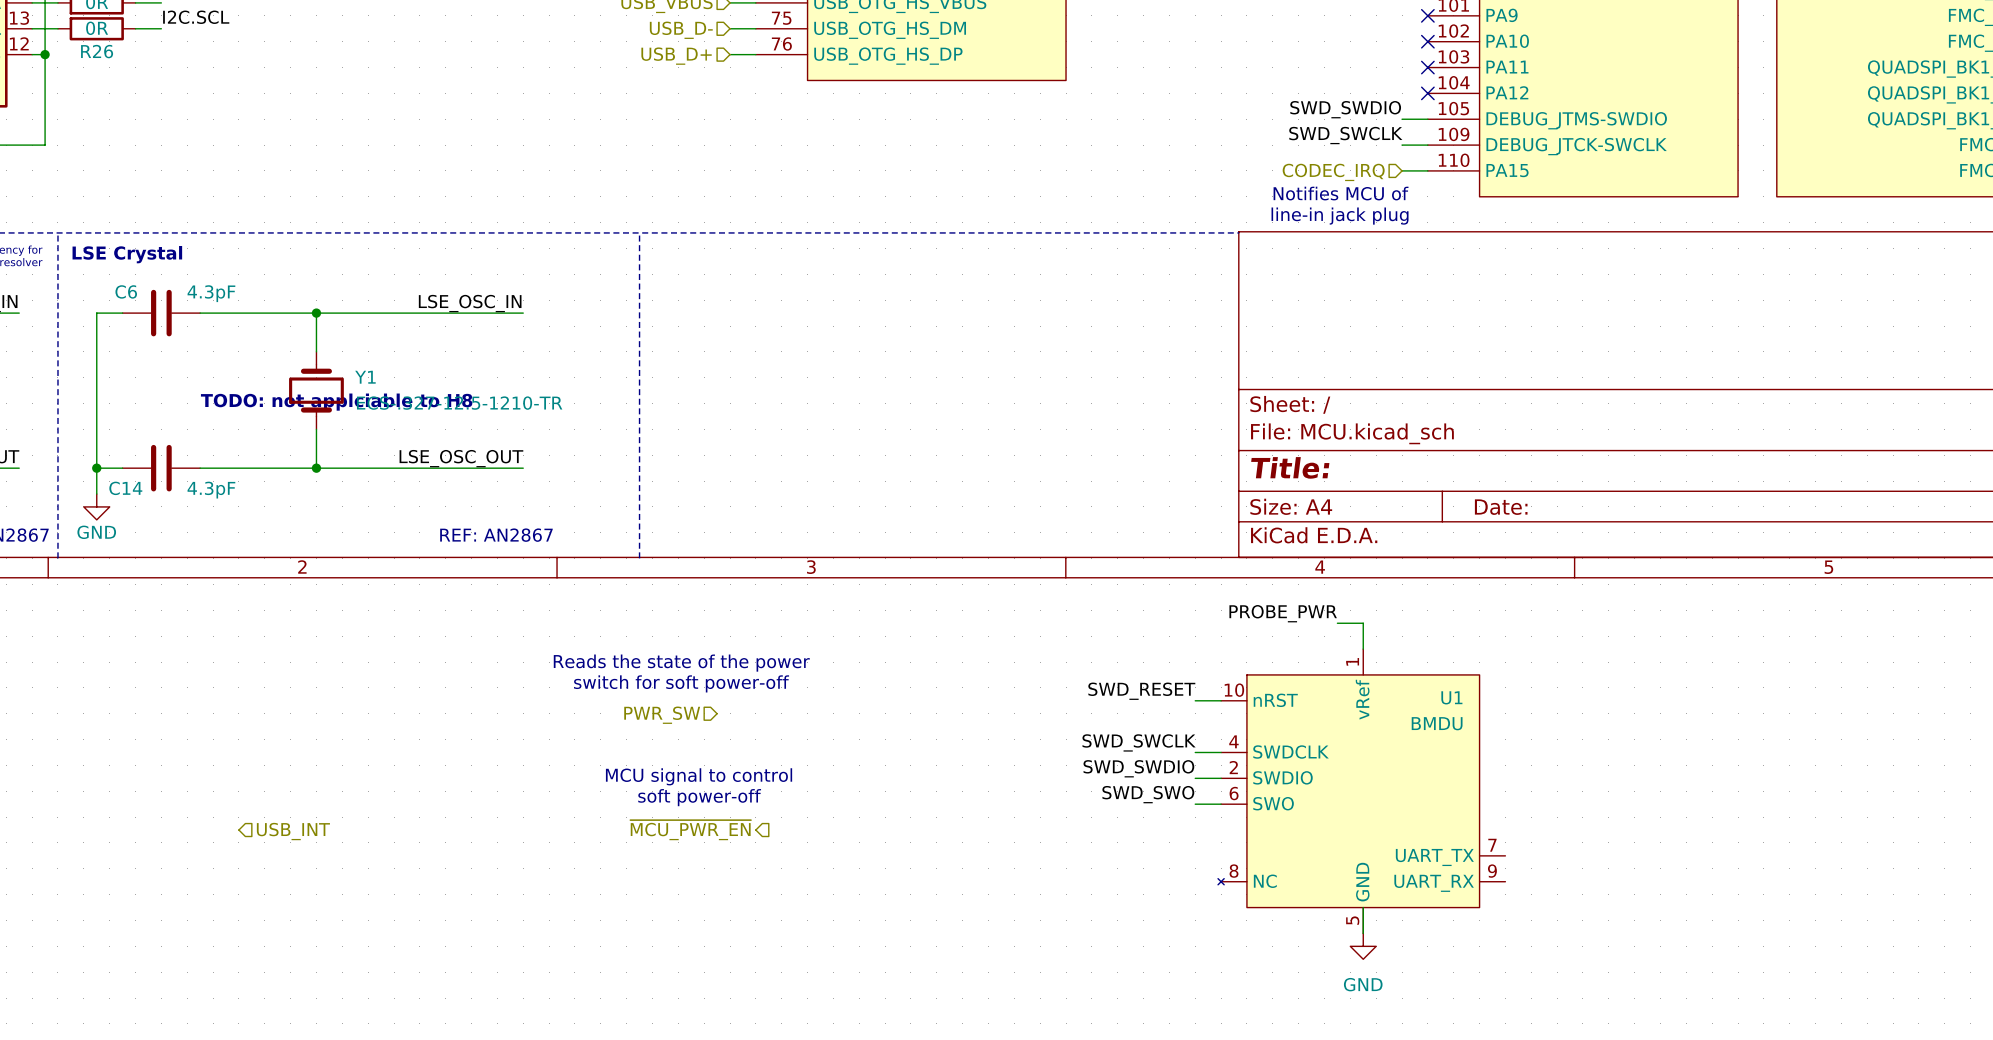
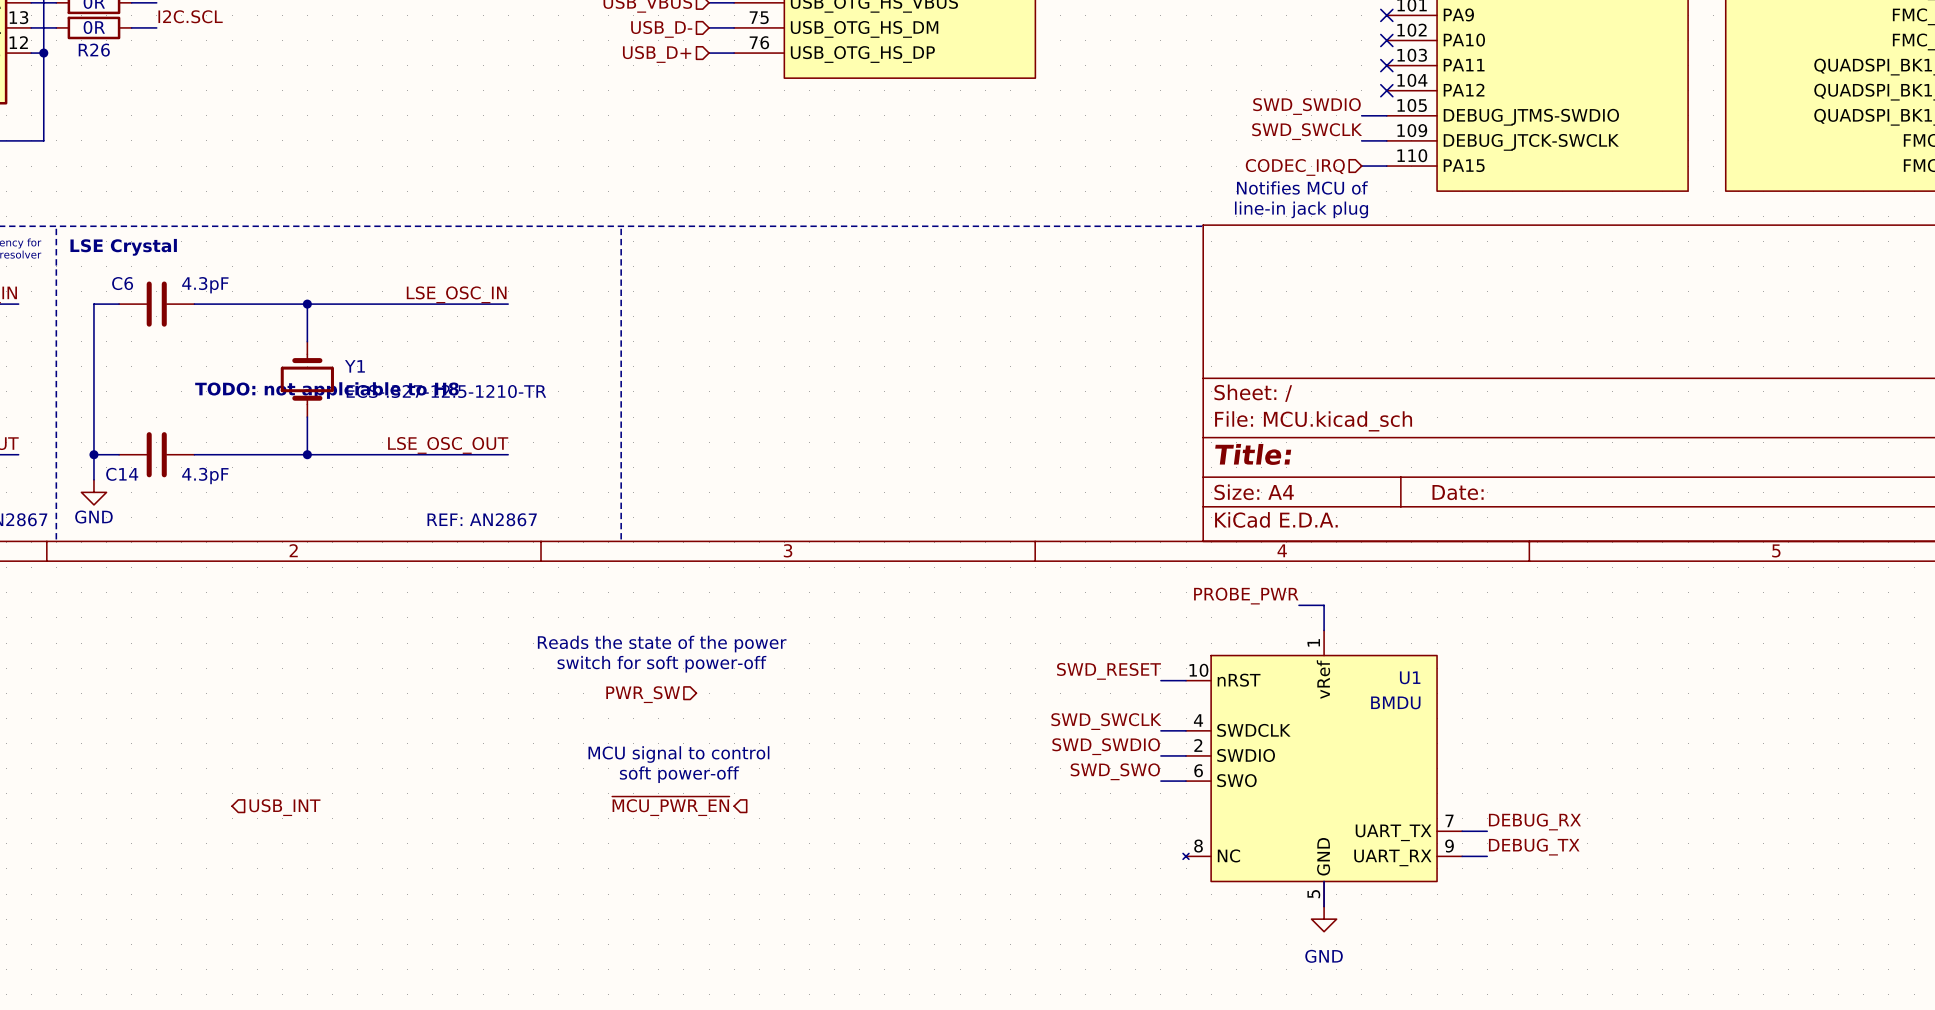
label: none -> DEBUG_RX (1534, 821)
wire: none -> (1462, 831) (1487, 831)
label: none -> DEBUG_TX (1534, 847)
wire: none -> (1462, 856) (1487, 856)

